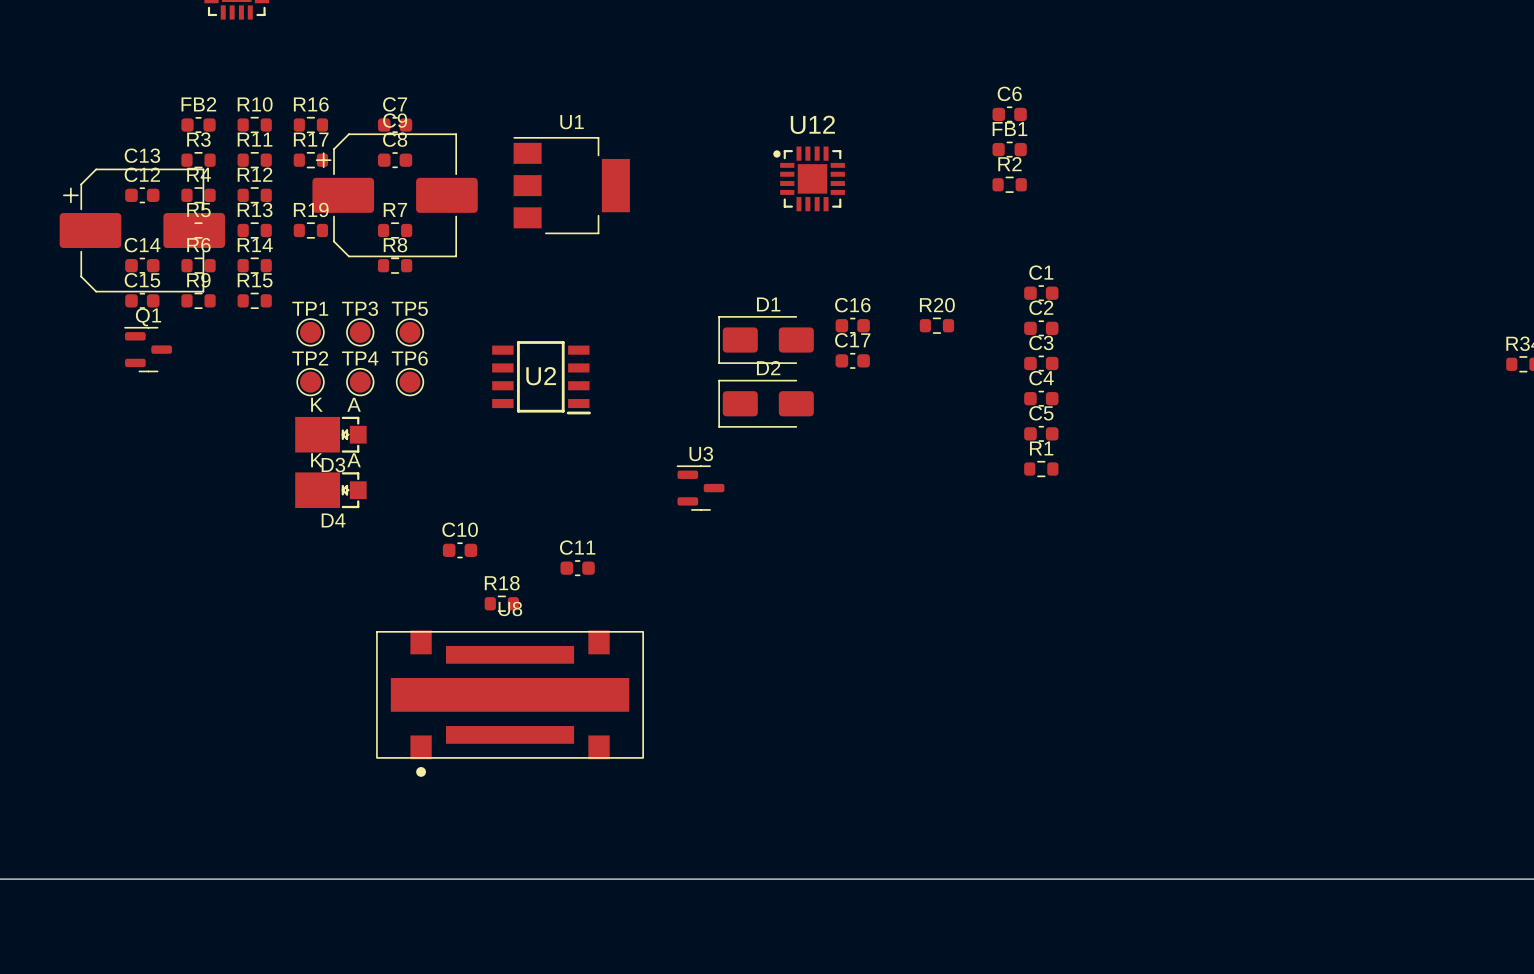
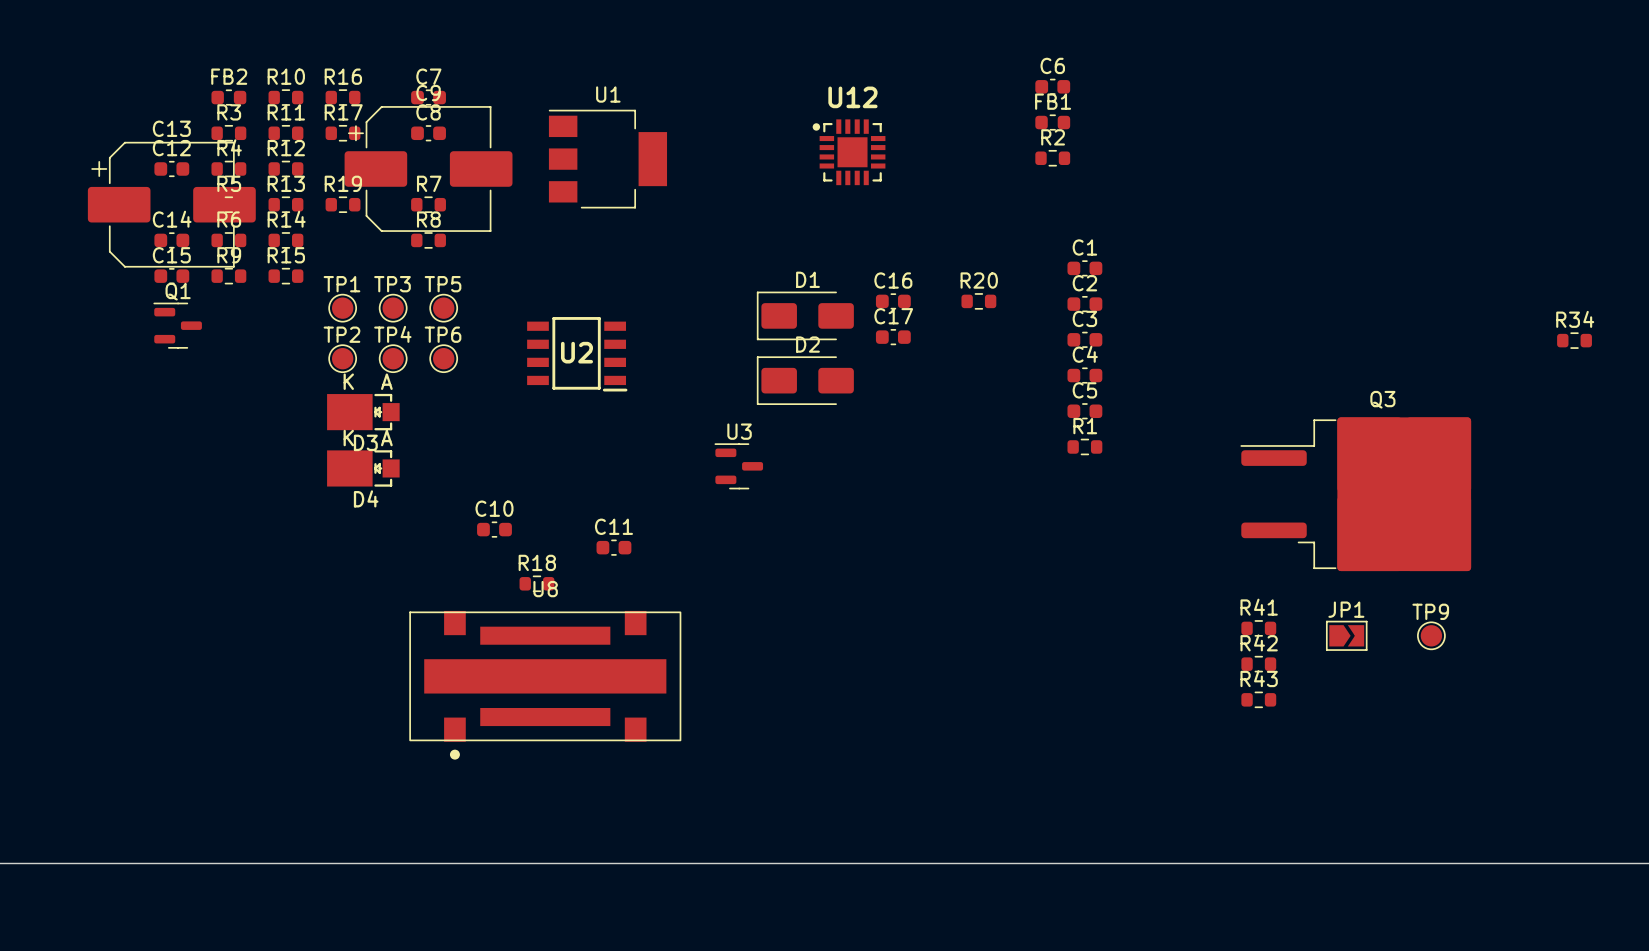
Q3: none -> (1355, 494)
R41: none -> (1258, 628)
JP1: none -> (1346, 635)
TP9: none -> (1431, 635)
R42: none -> (1258, 664)
R43: none -> (1258, 699)

